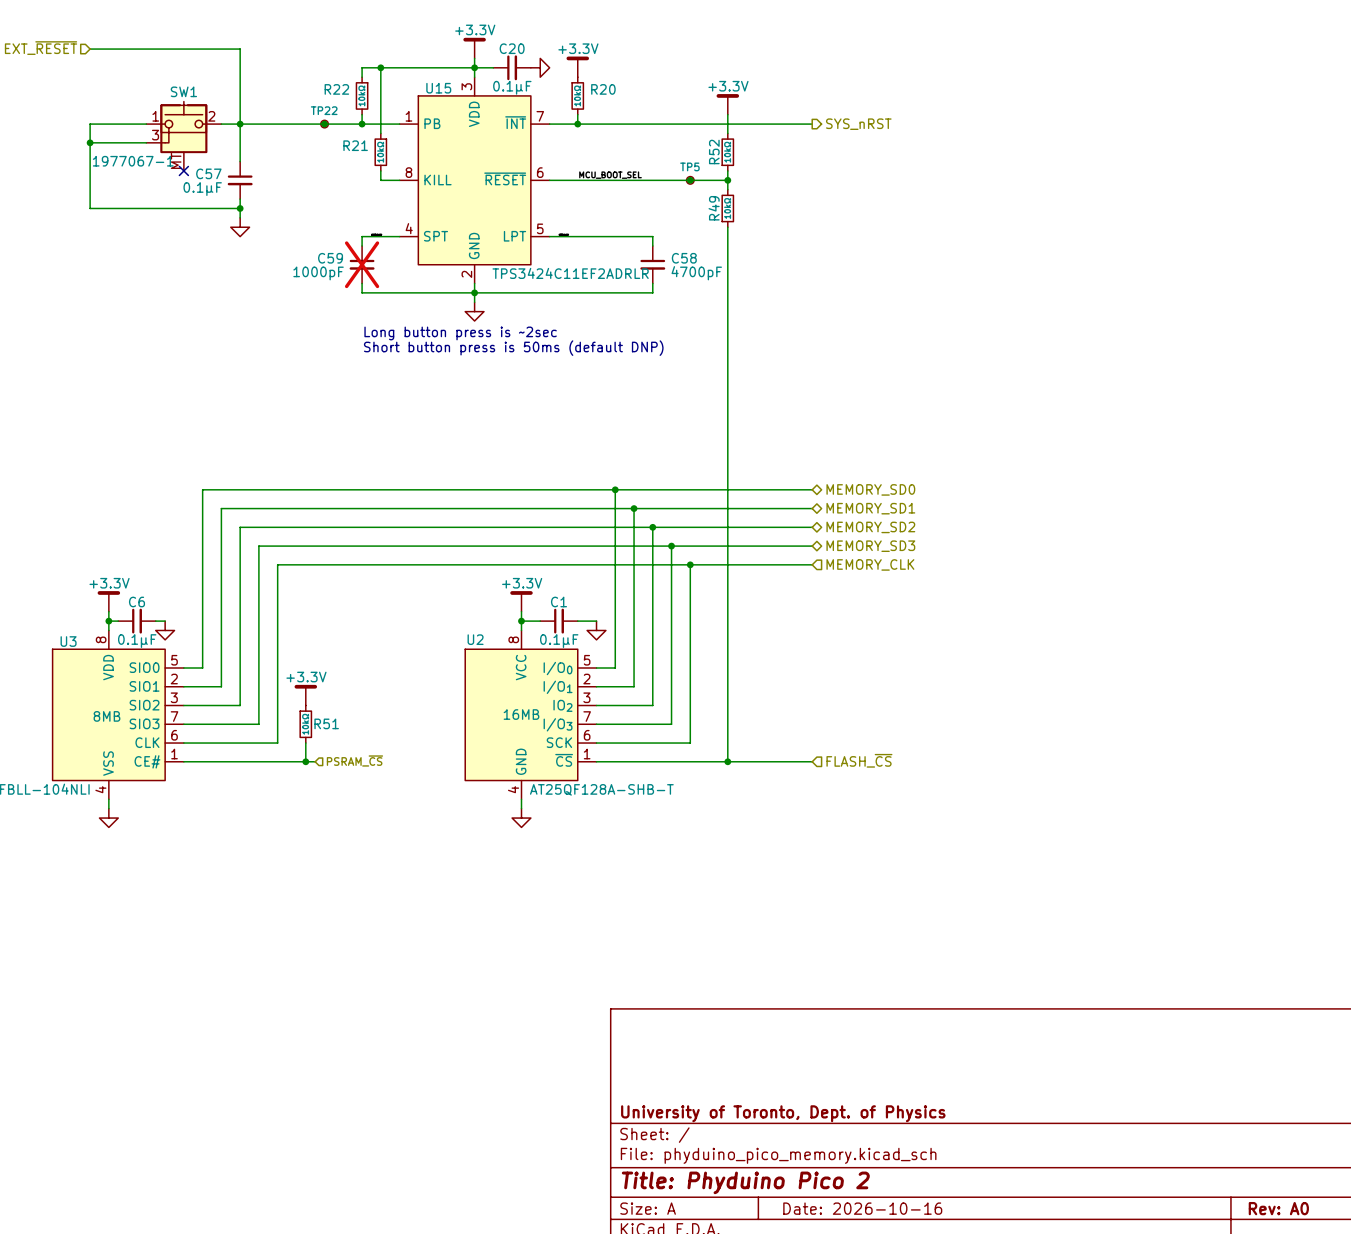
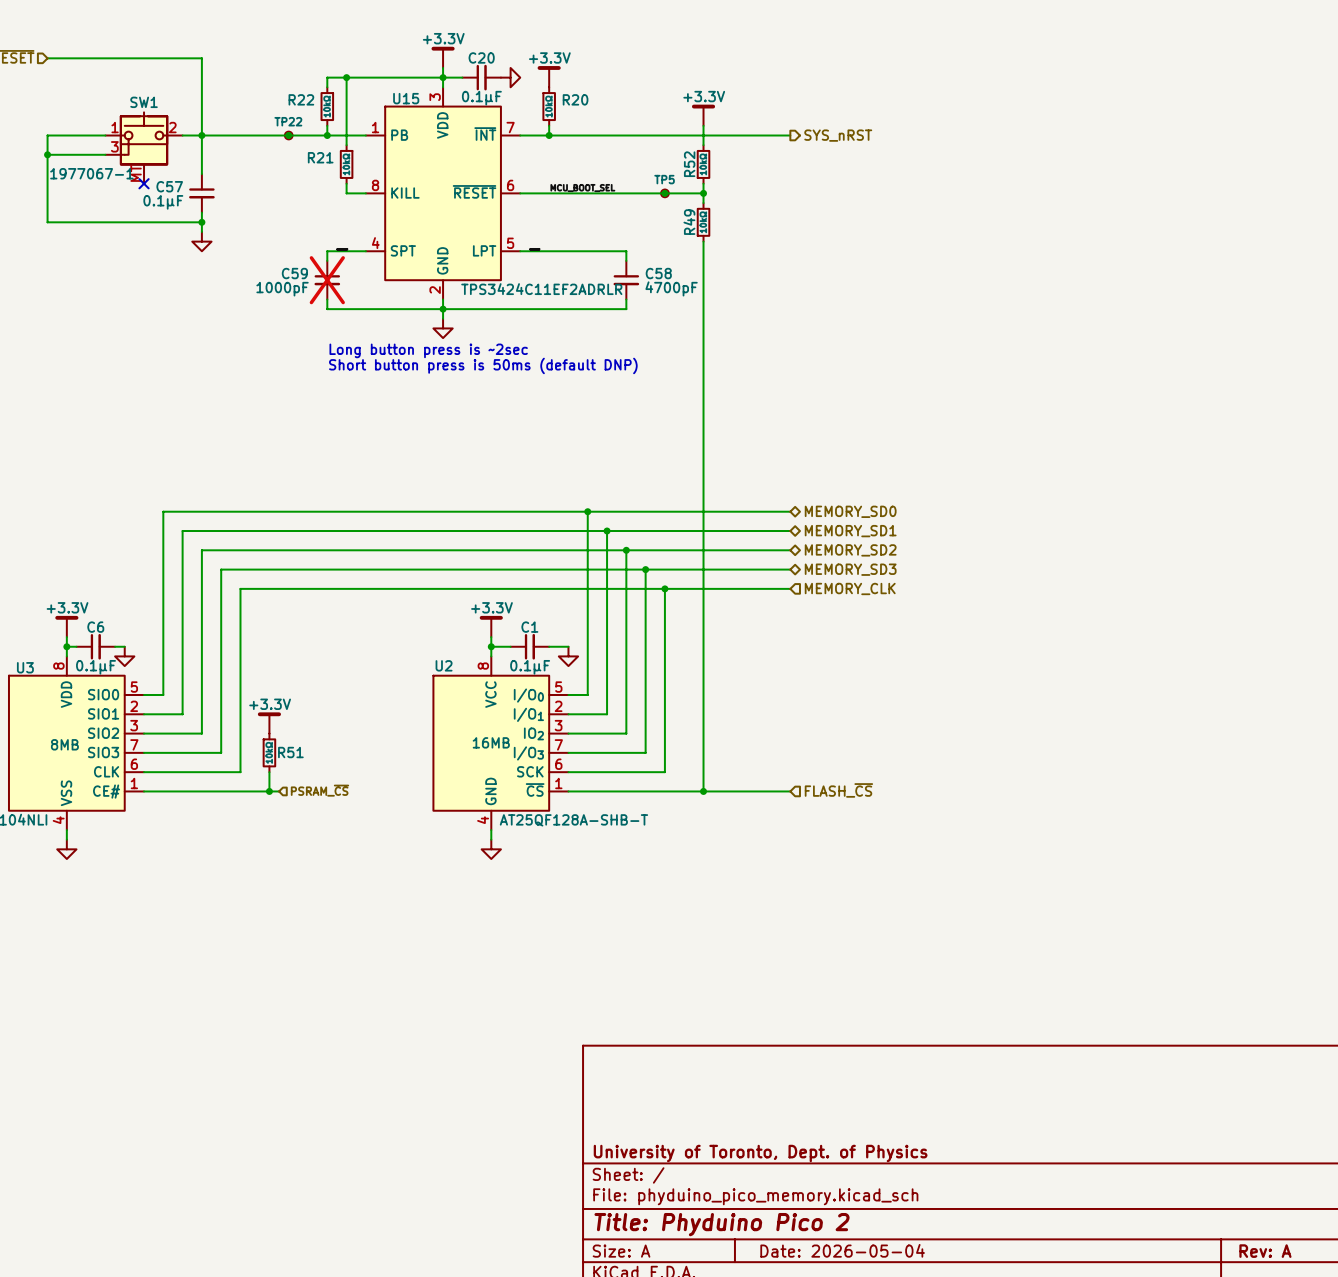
title block: Date: 2026-10-16 (862, 1208) -> Date: 2026-05-04 (842, 1250)
title block: Rev: A0 (1278, 1208) -> Rev: A (1265, 1251)

